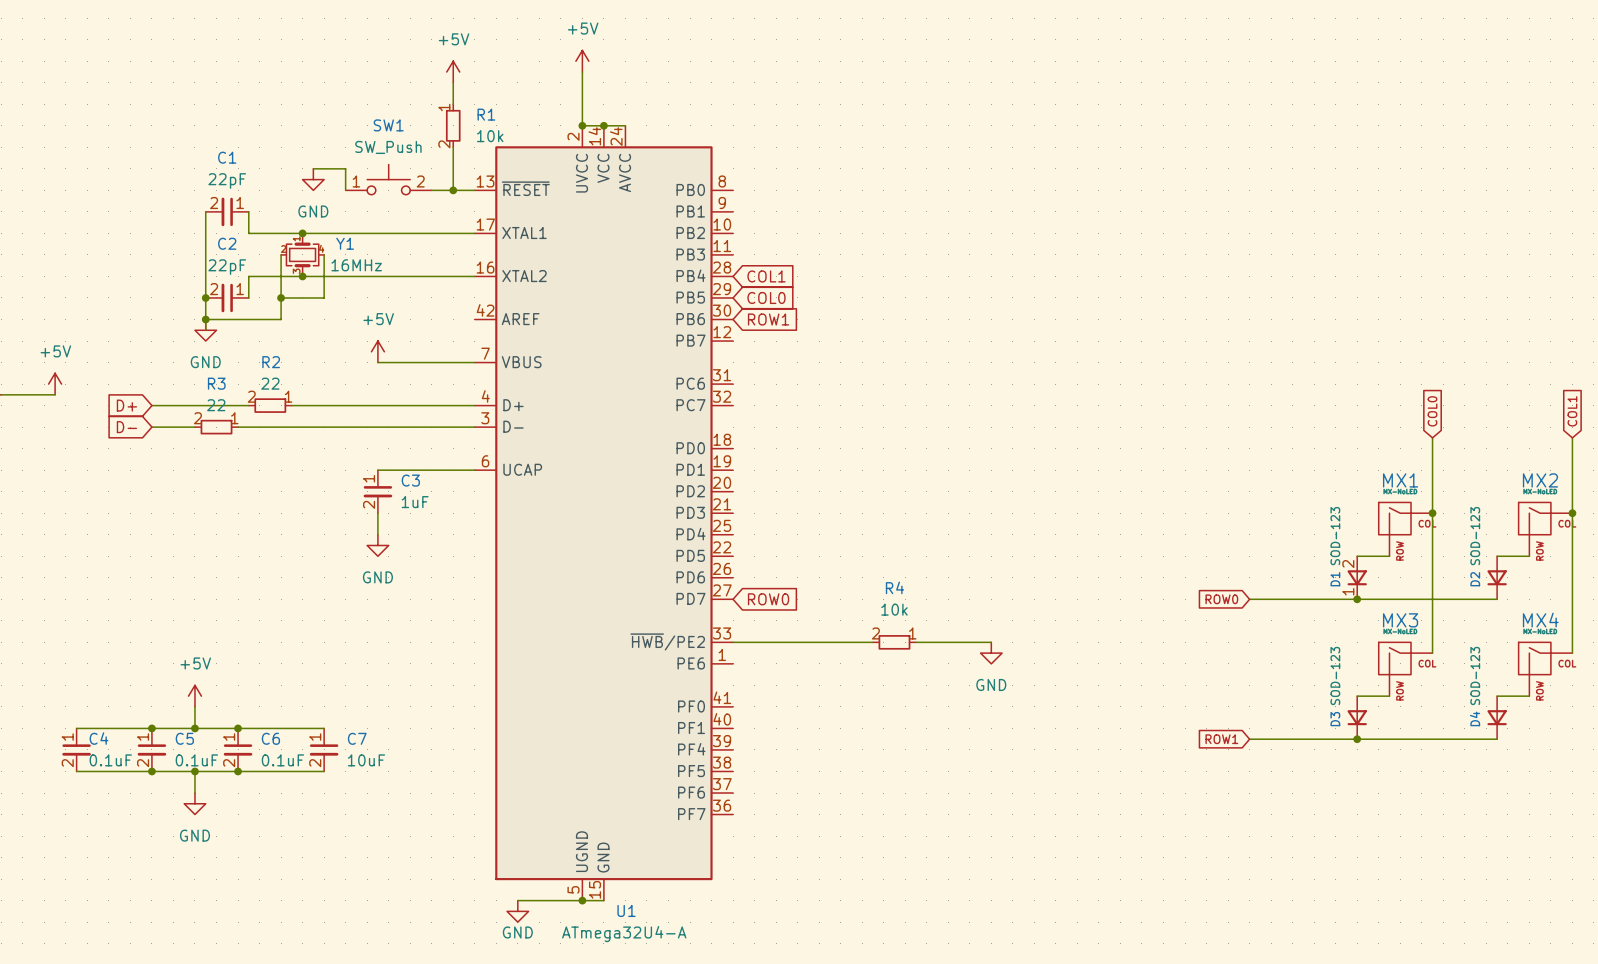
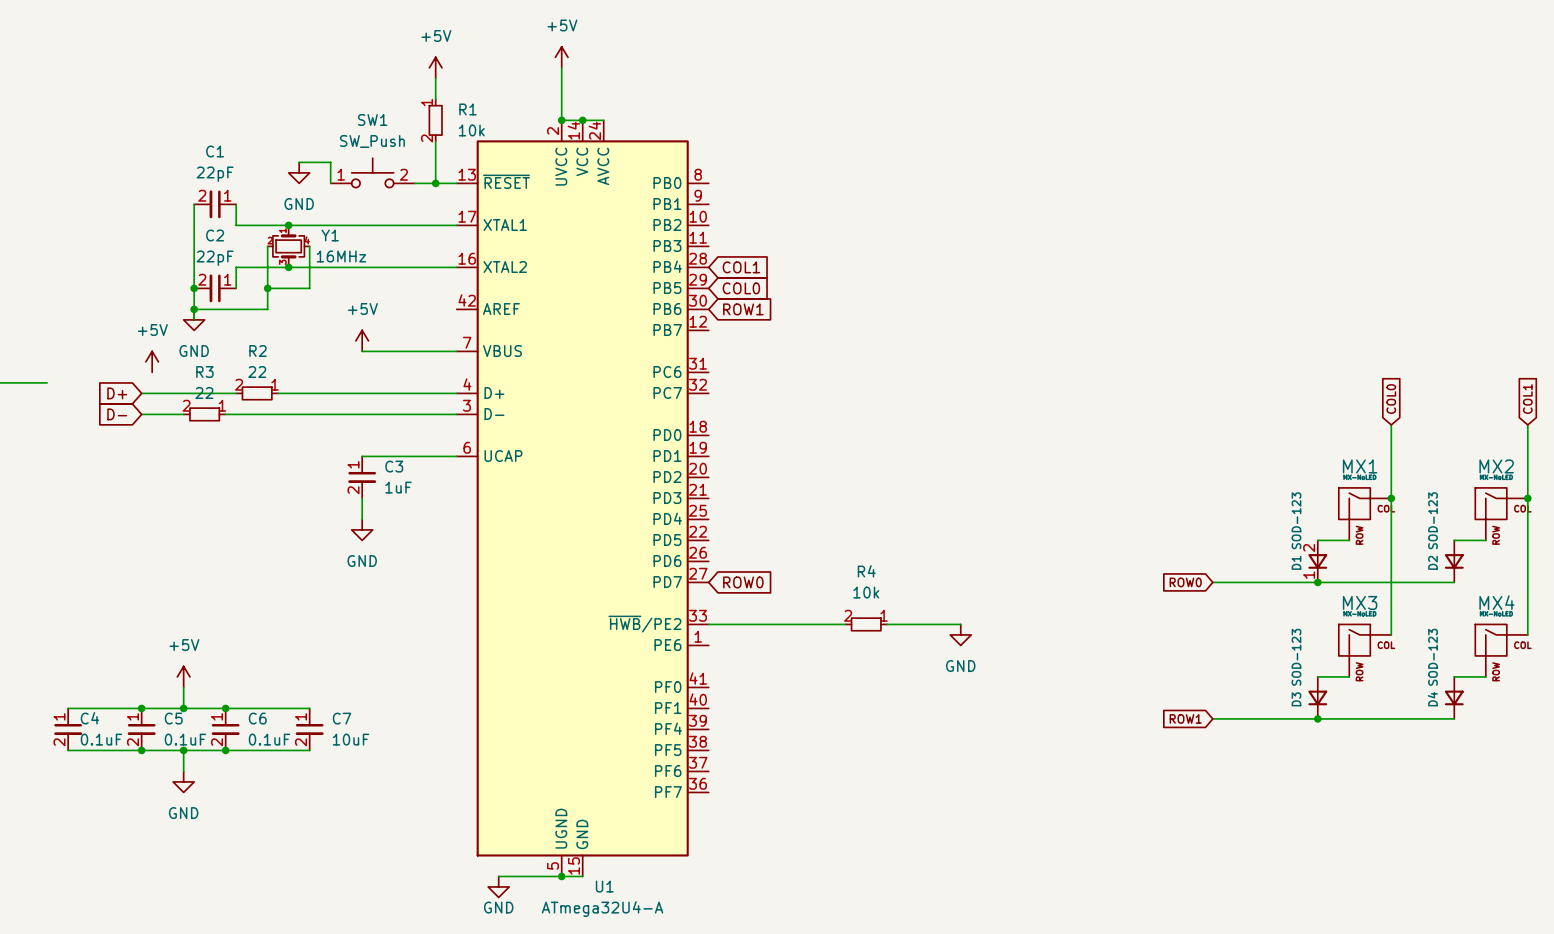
power symbol position: +5V (55, 384) -> +5V (152, 361)

